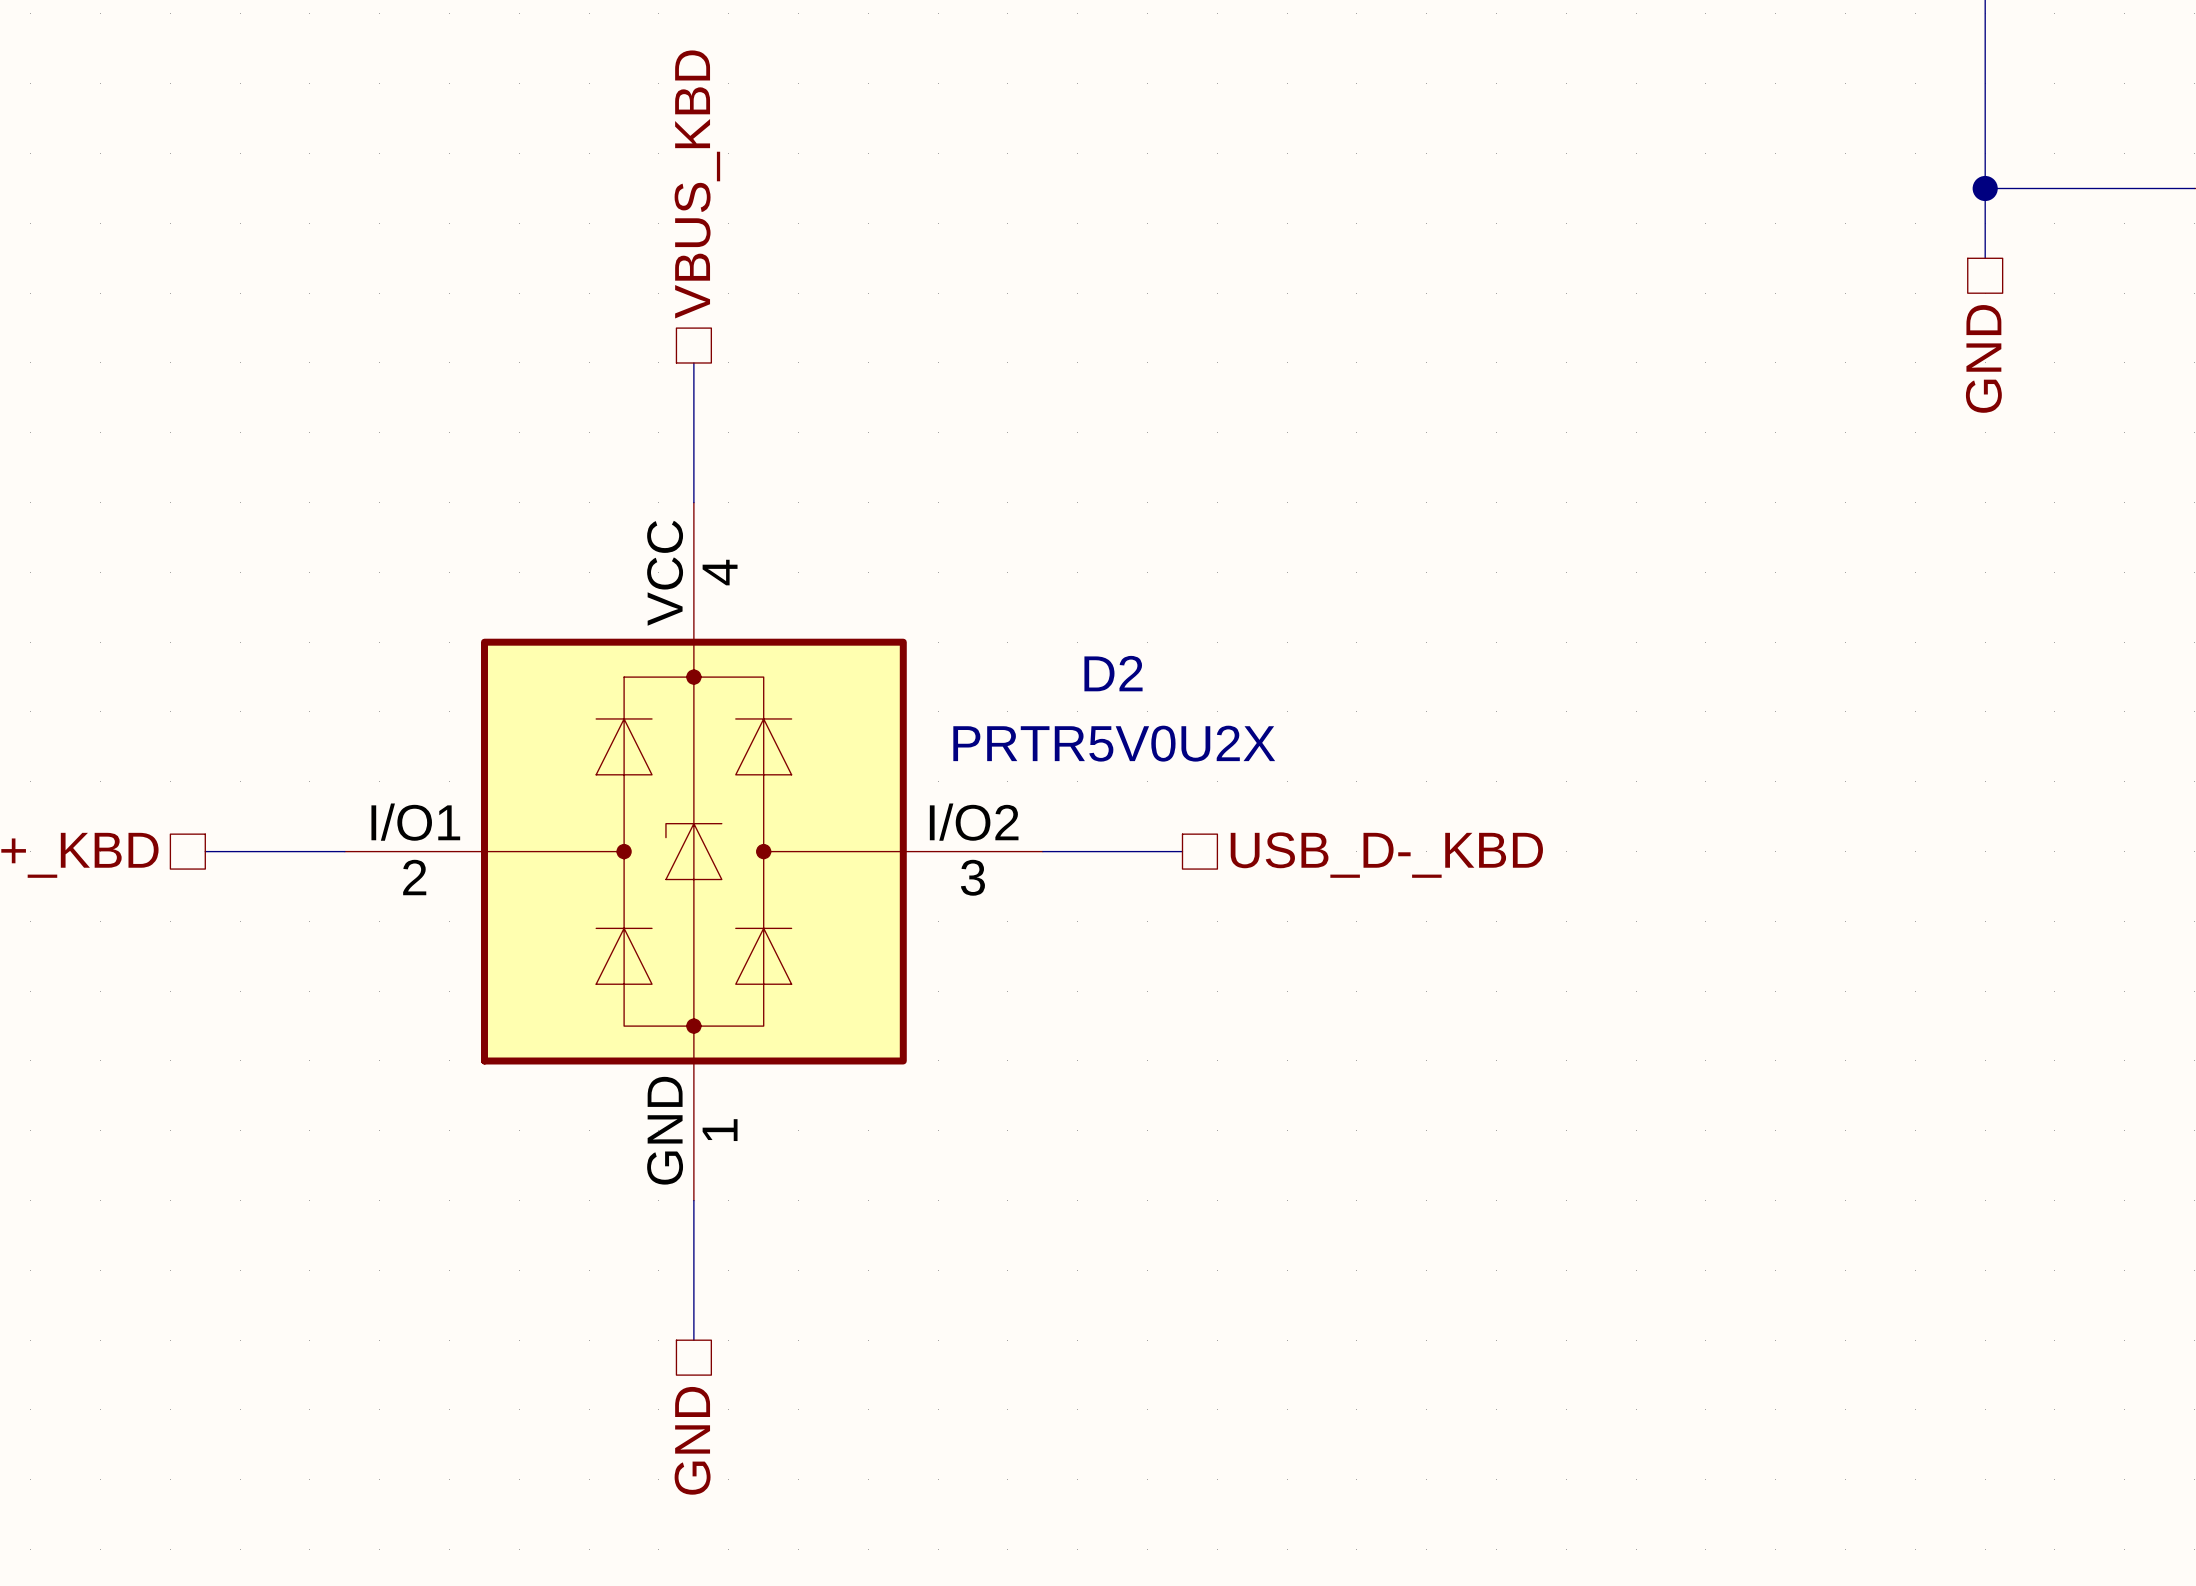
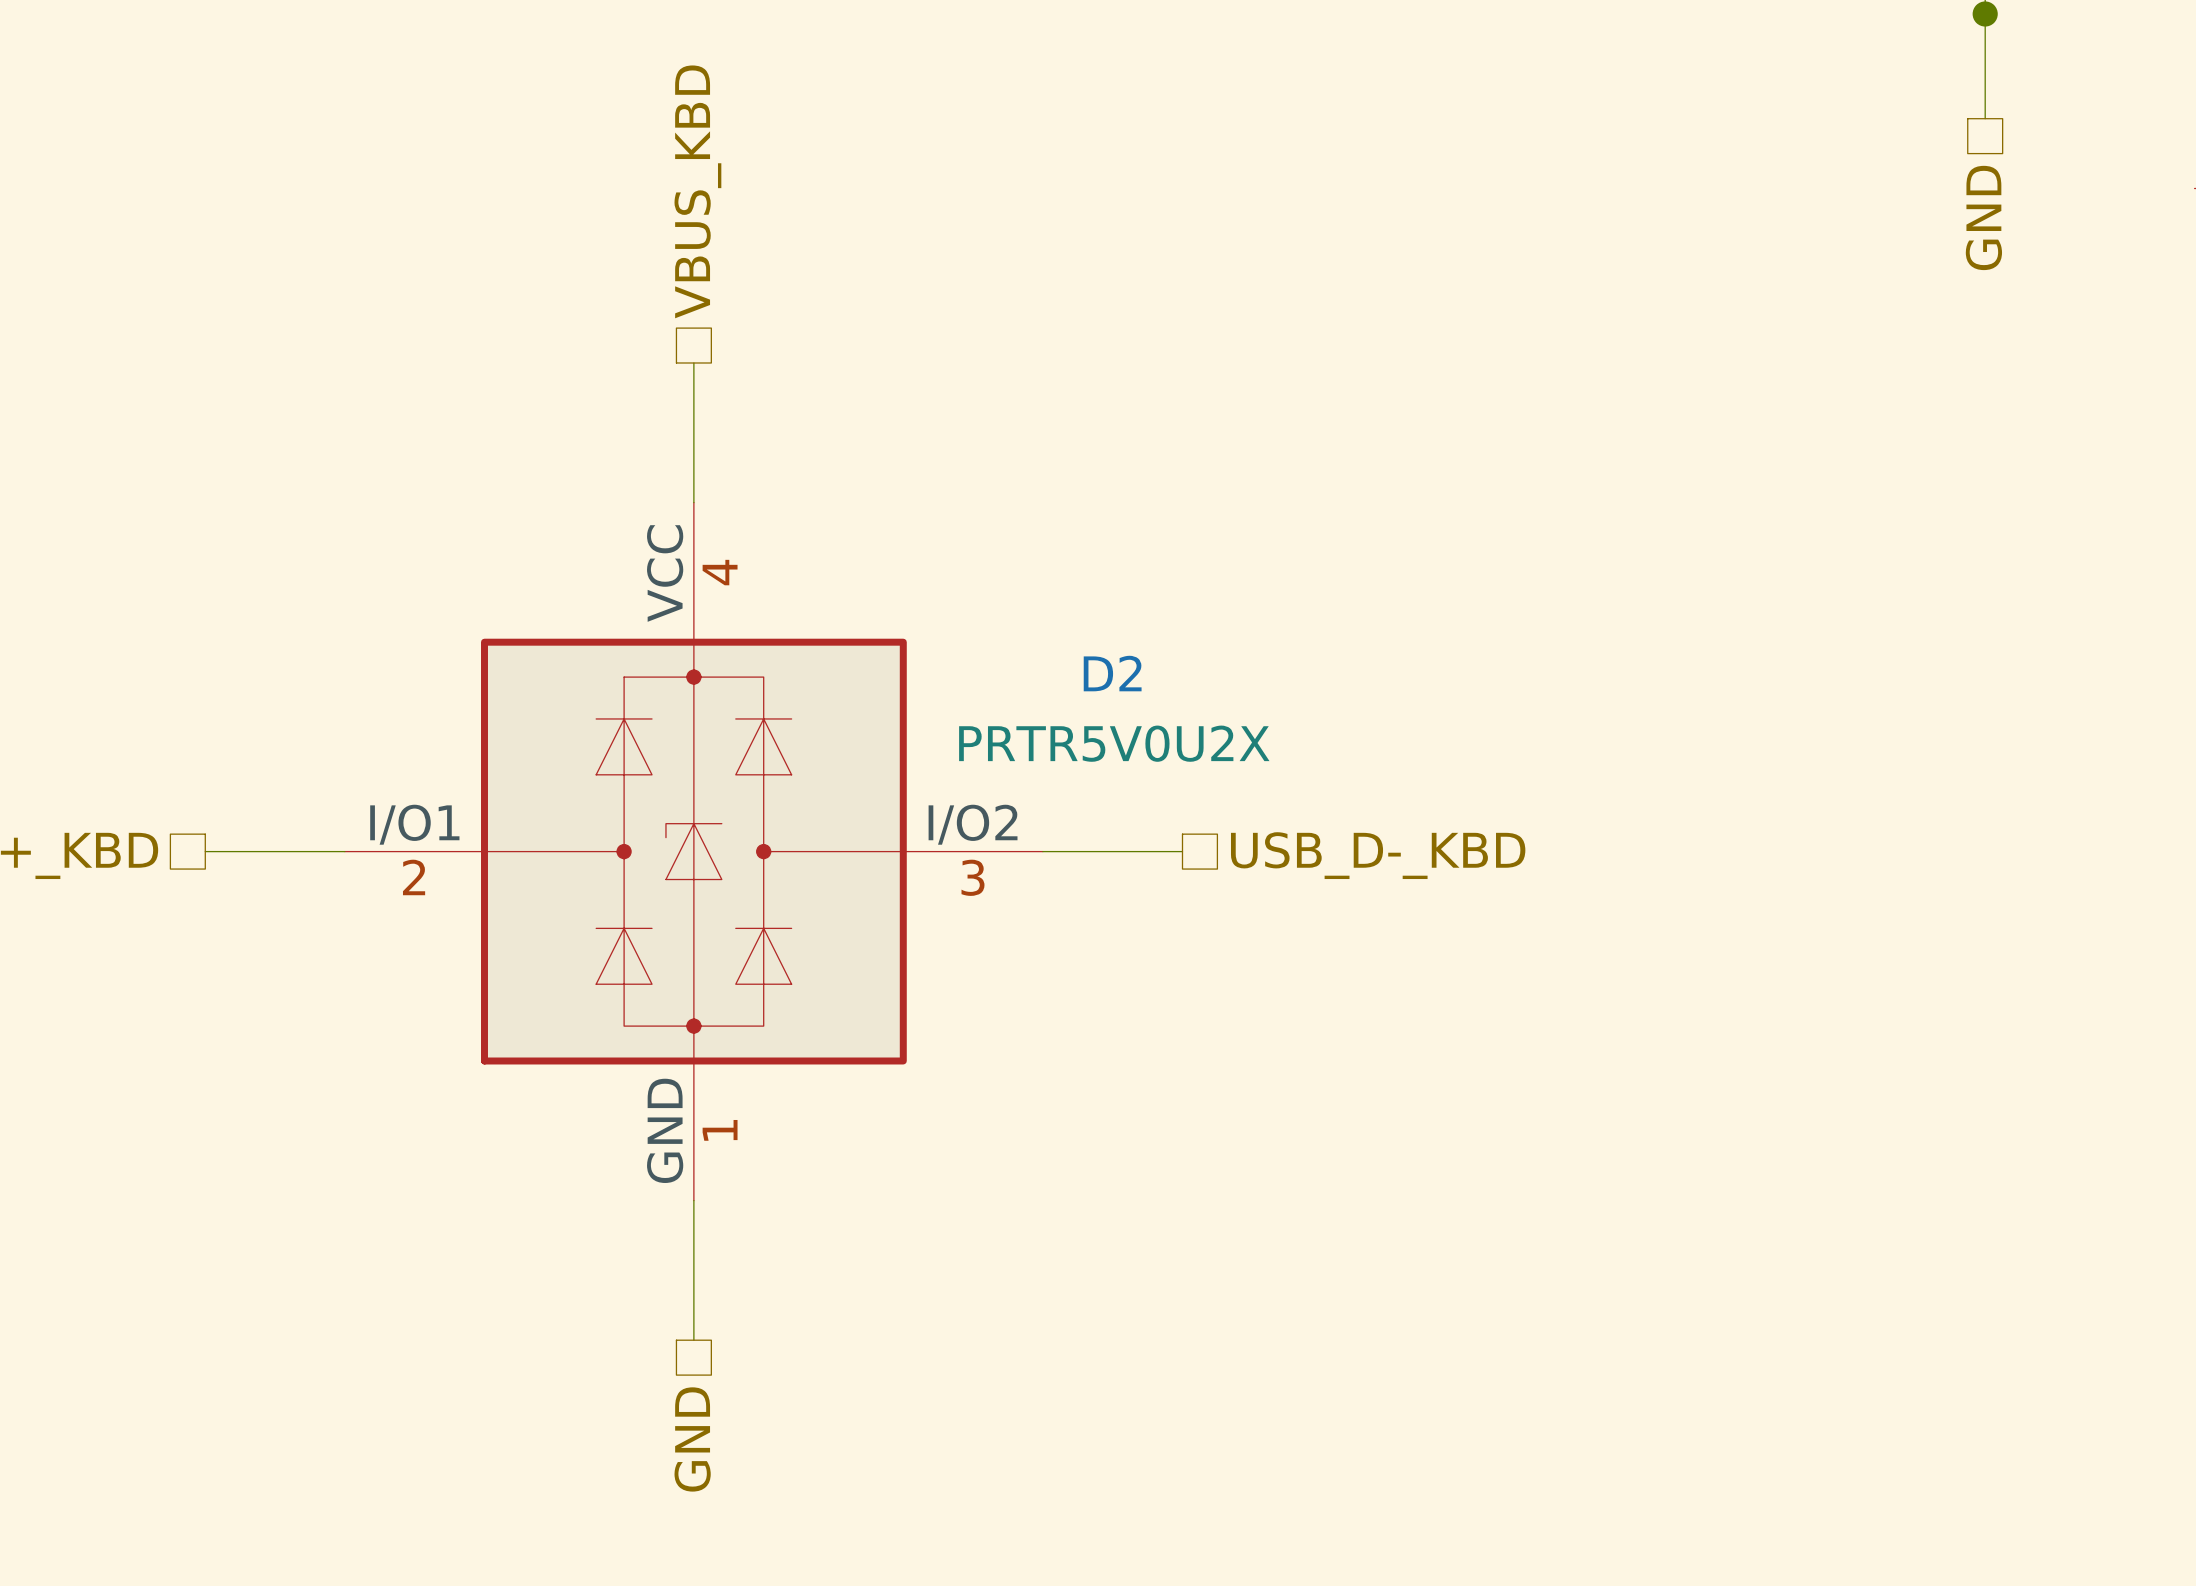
junction: none -> (1985, 13)
wire: (1985, 118) (1985, 258) -> none
wire: (1985, 188) (2194, 188) -> none
junction: (1985, 188) -> none
hierarchical label position: GND (1983, 358) -> GND (1983, 217)

